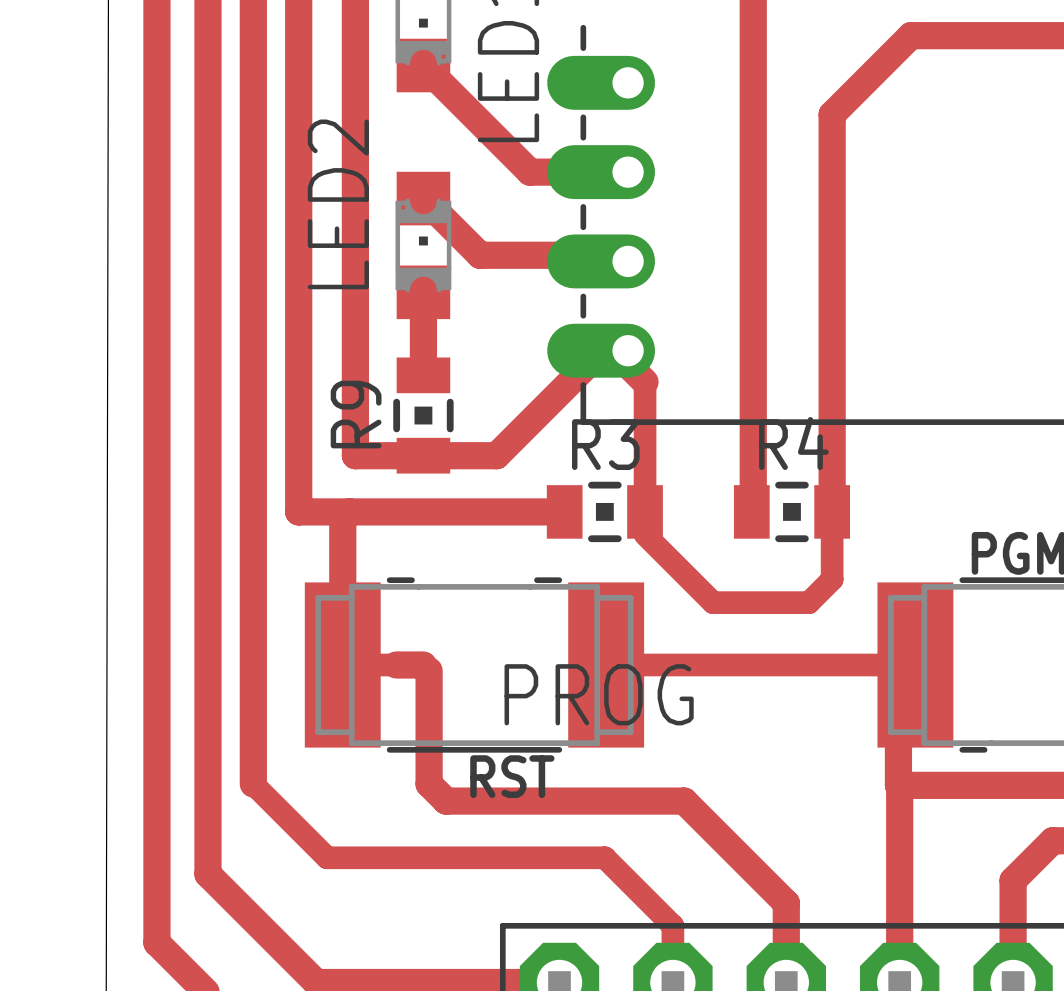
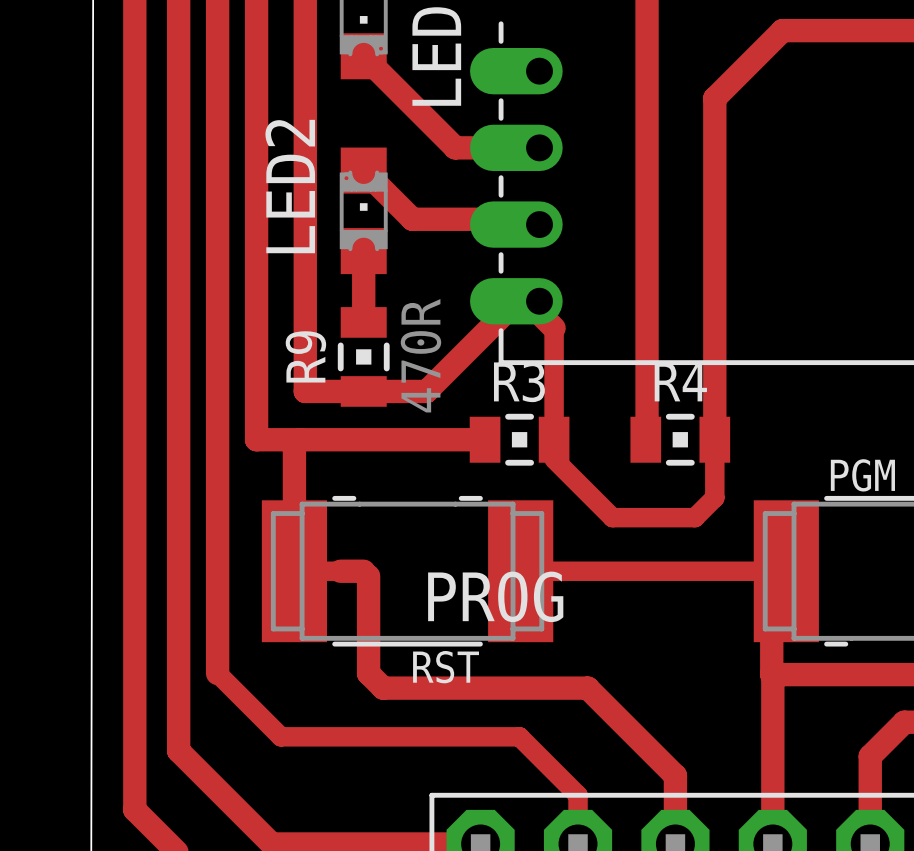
R9 value: none -> 470R (420, 355)

